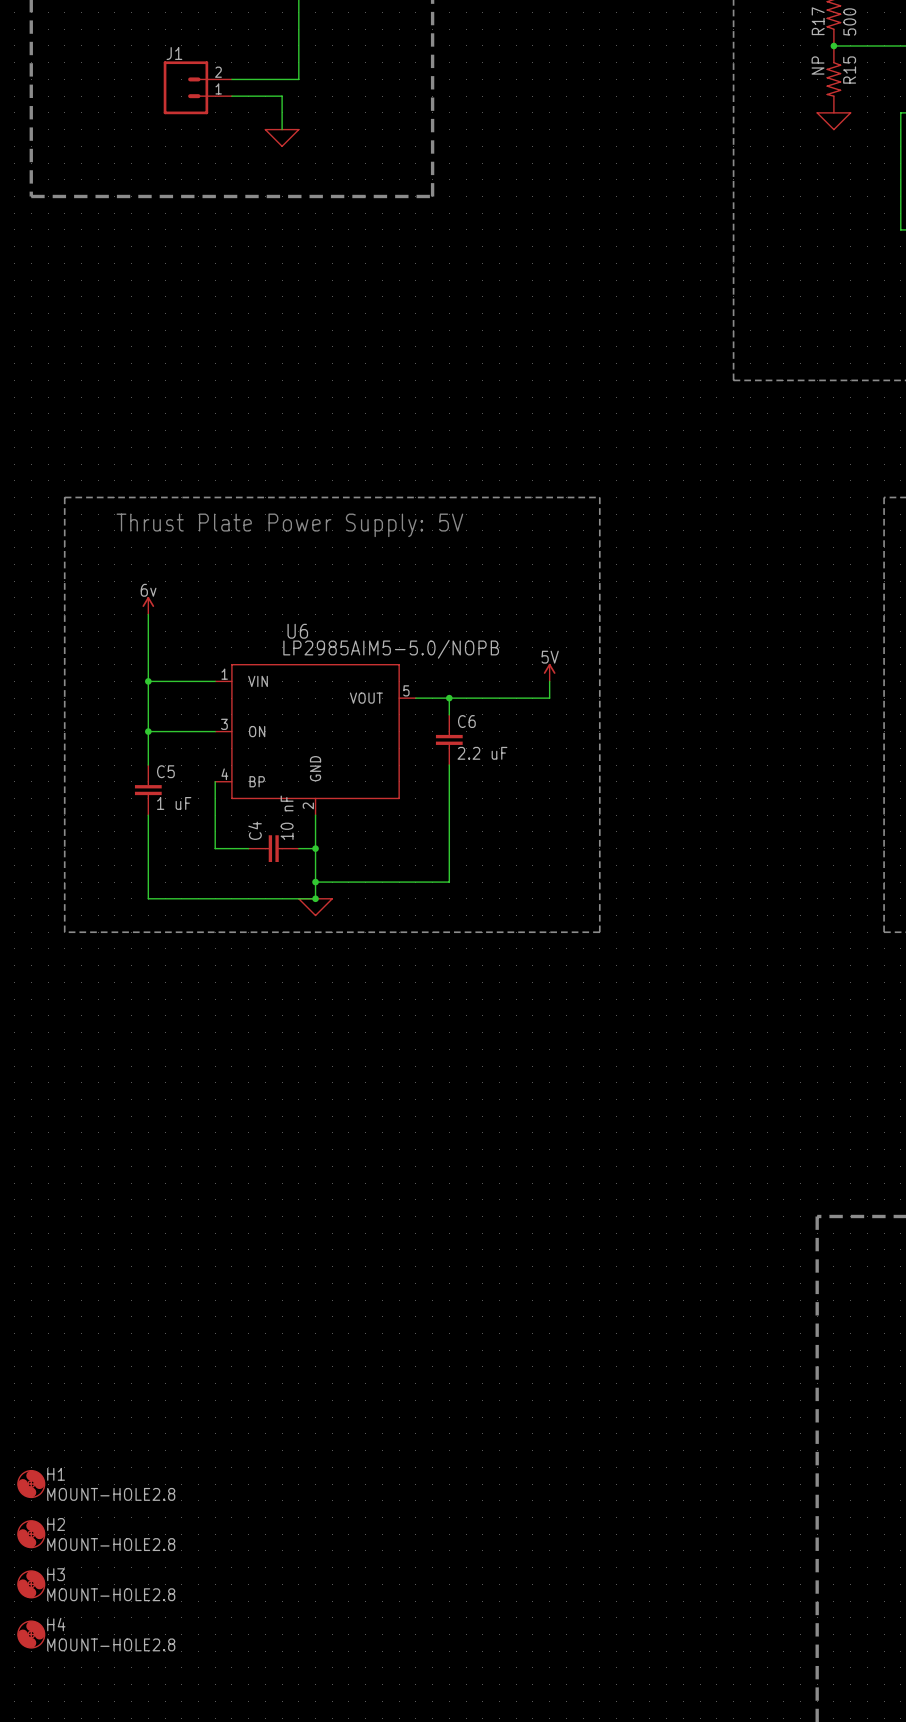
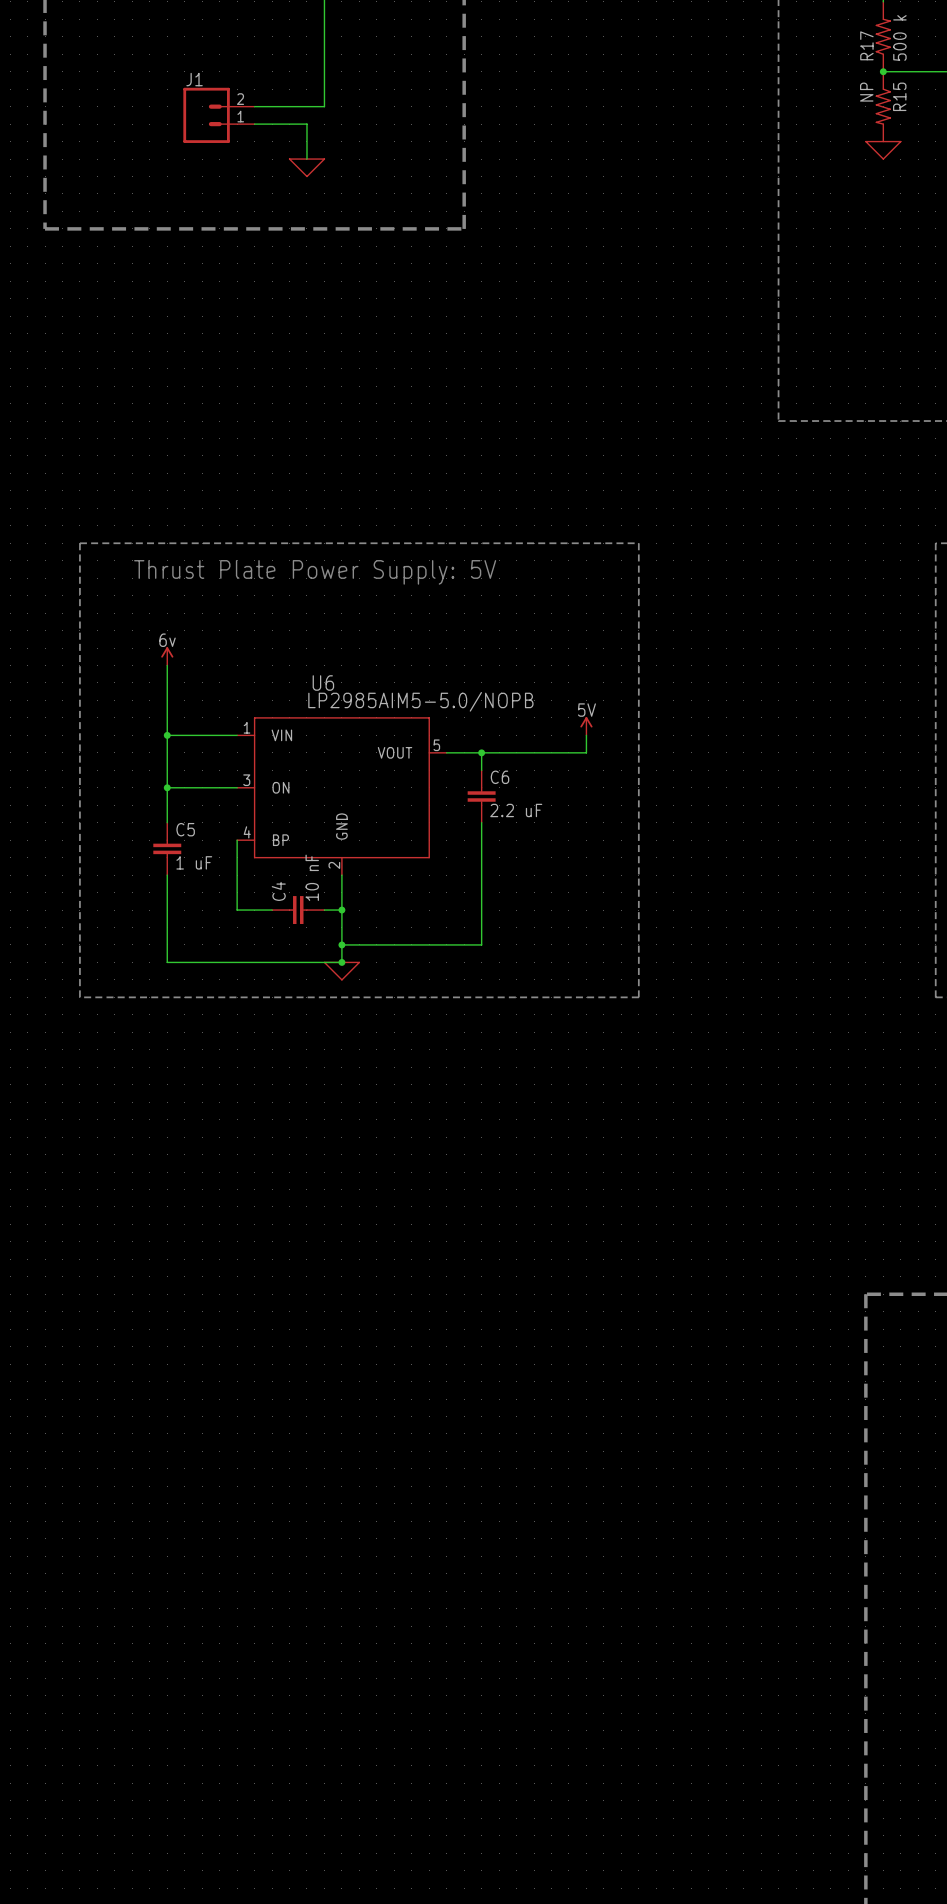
H1: MOUNT-HOLE2.8 (31, 1484) -> none
H2: MOUNT-HOLE2.8 (31, 1534) -> none
H3: MOUNT-HOLE2.8 (31, 1584) -> none
H4: MOUNT-HOLE2.8 (31, 1634) -> none

